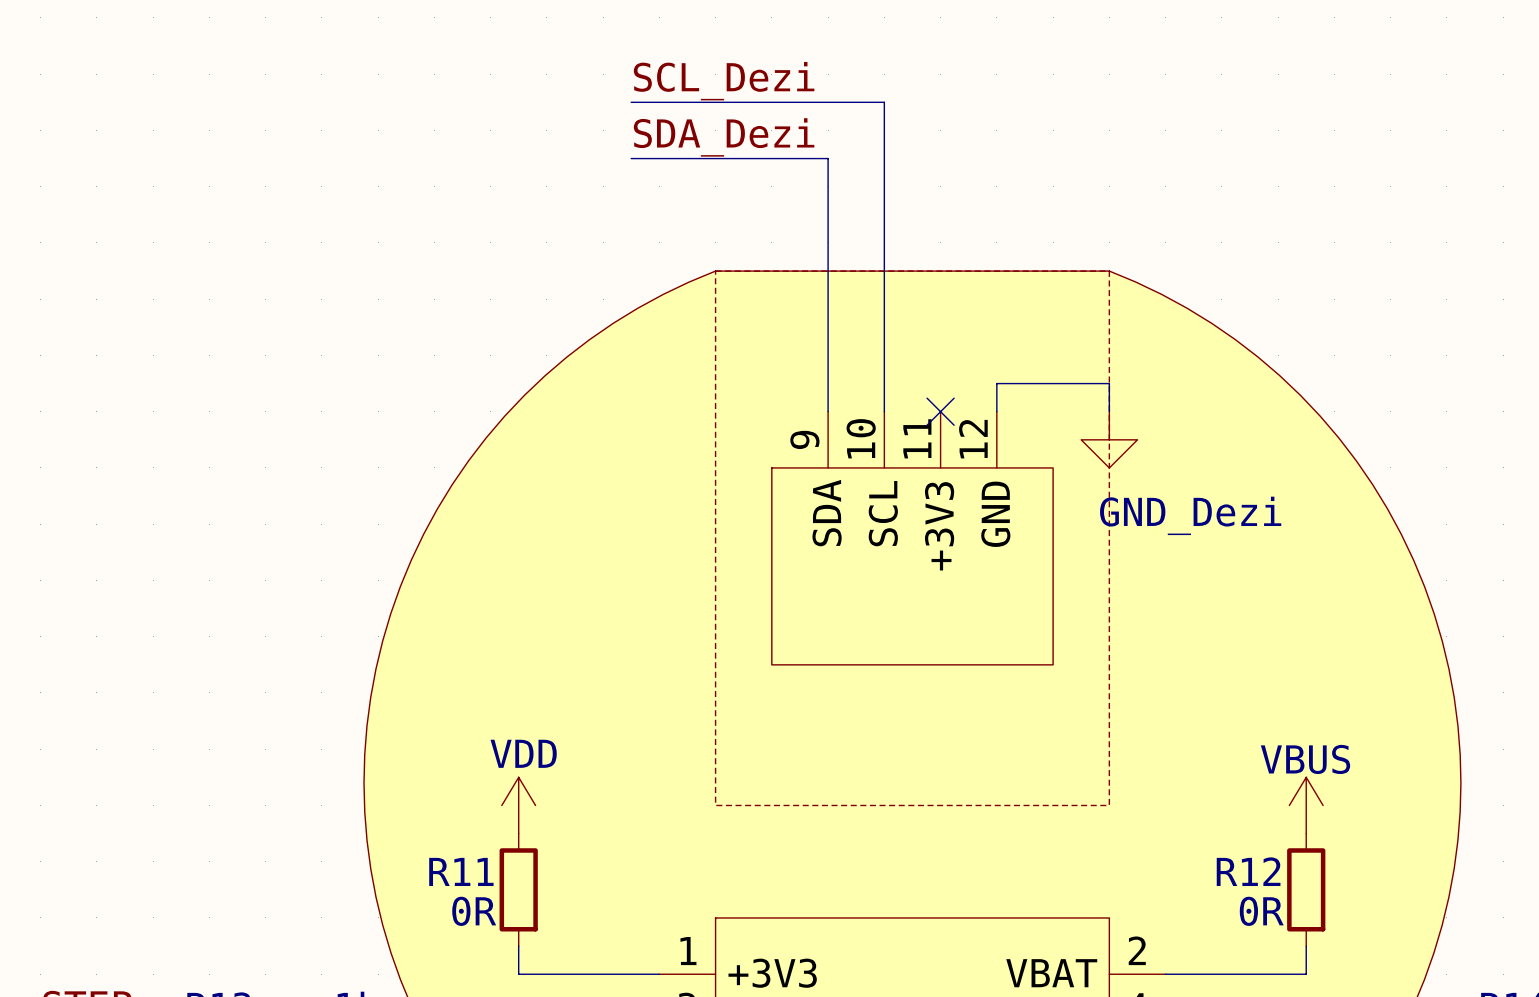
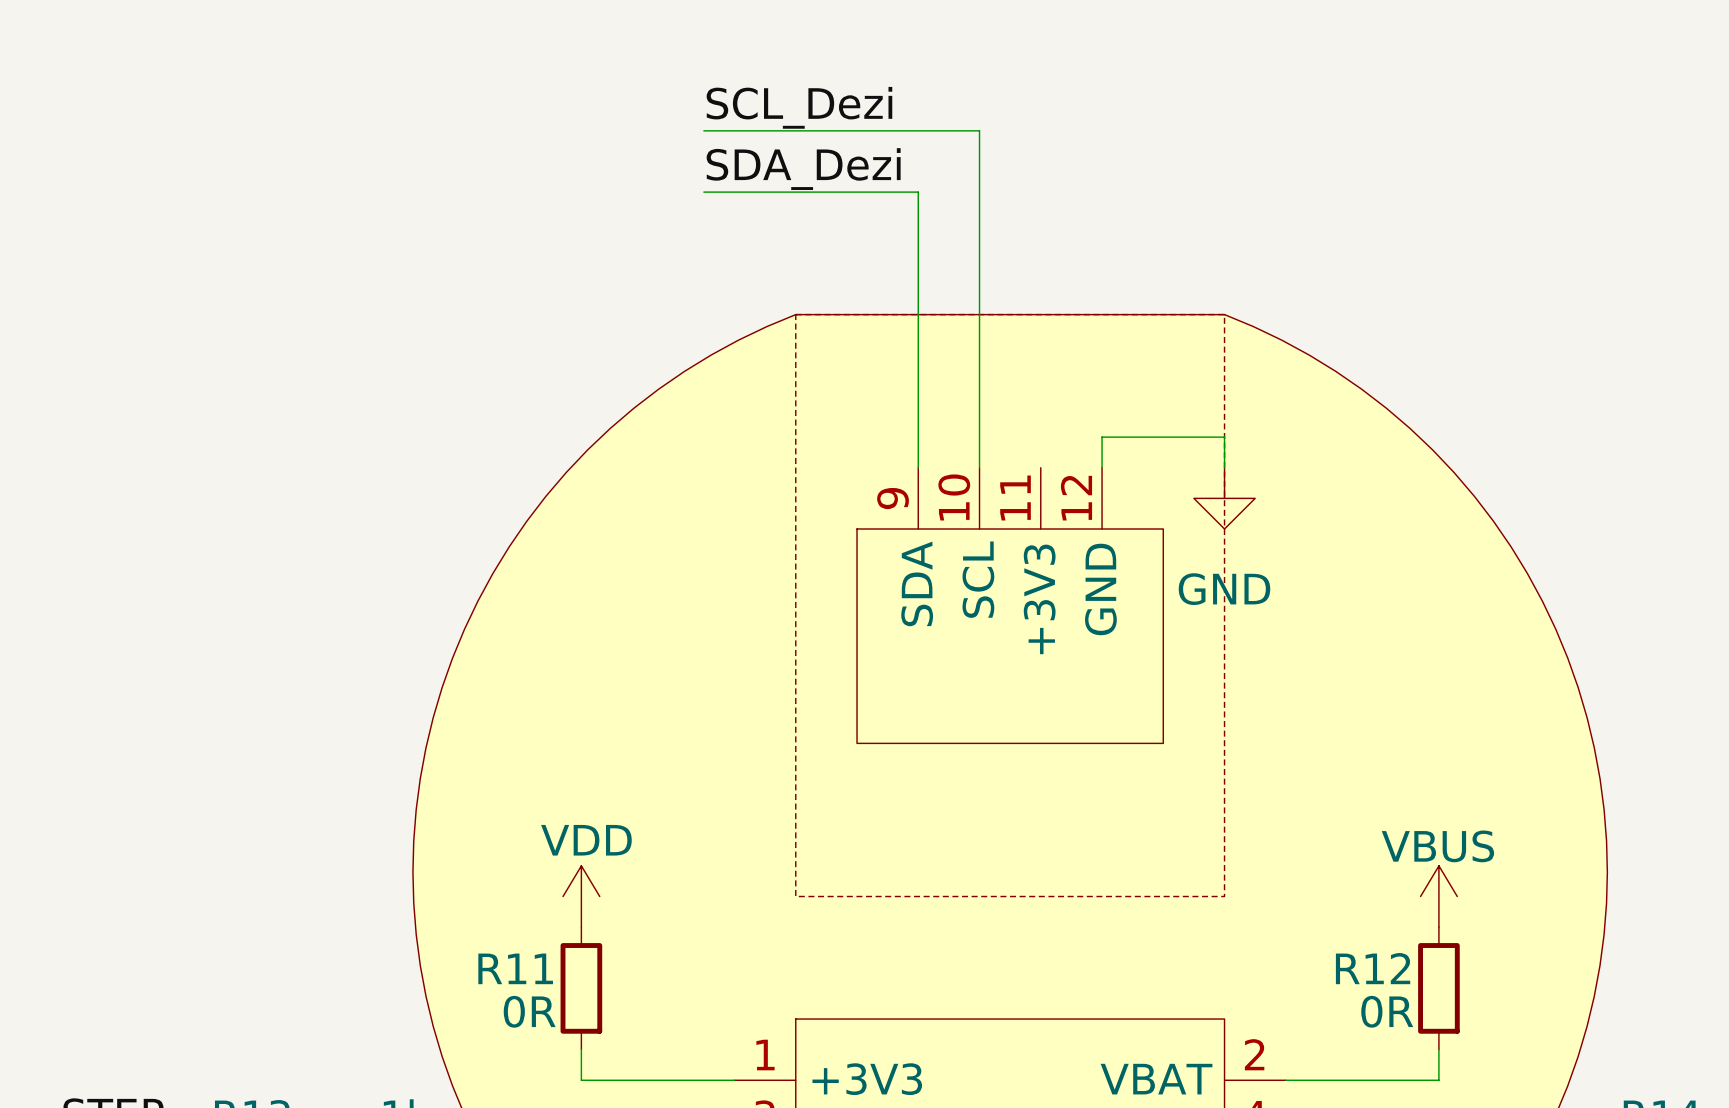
no-connect mark: (940, 411) -> none
power symbol: GND_Dezi (1109, 439) -> GND (1224, 498)

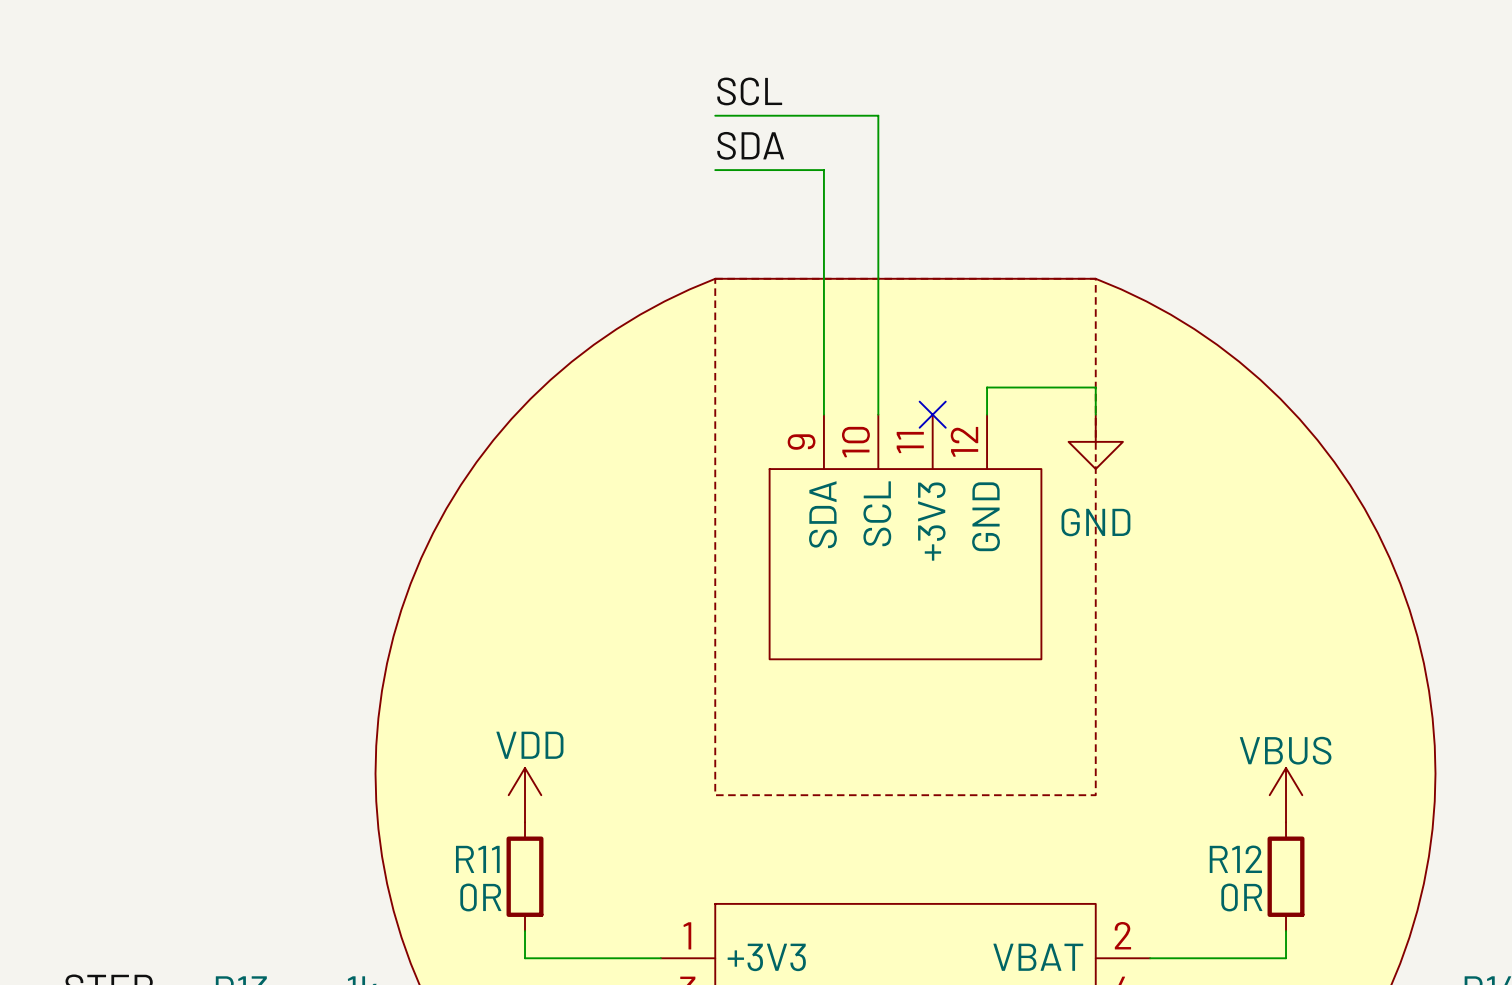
label: none -> SCL (749, 91)
label: SCL_Dezi (799, 107) -> none
wire: (703, 130) (795, 130) -> none
label: none -> SDA (750, 145)
label: SDA_Dezi (803, 169) -> none
wire: (703, 192) (795, 192) -> none
no-connect mark: none -> (932, 414)

